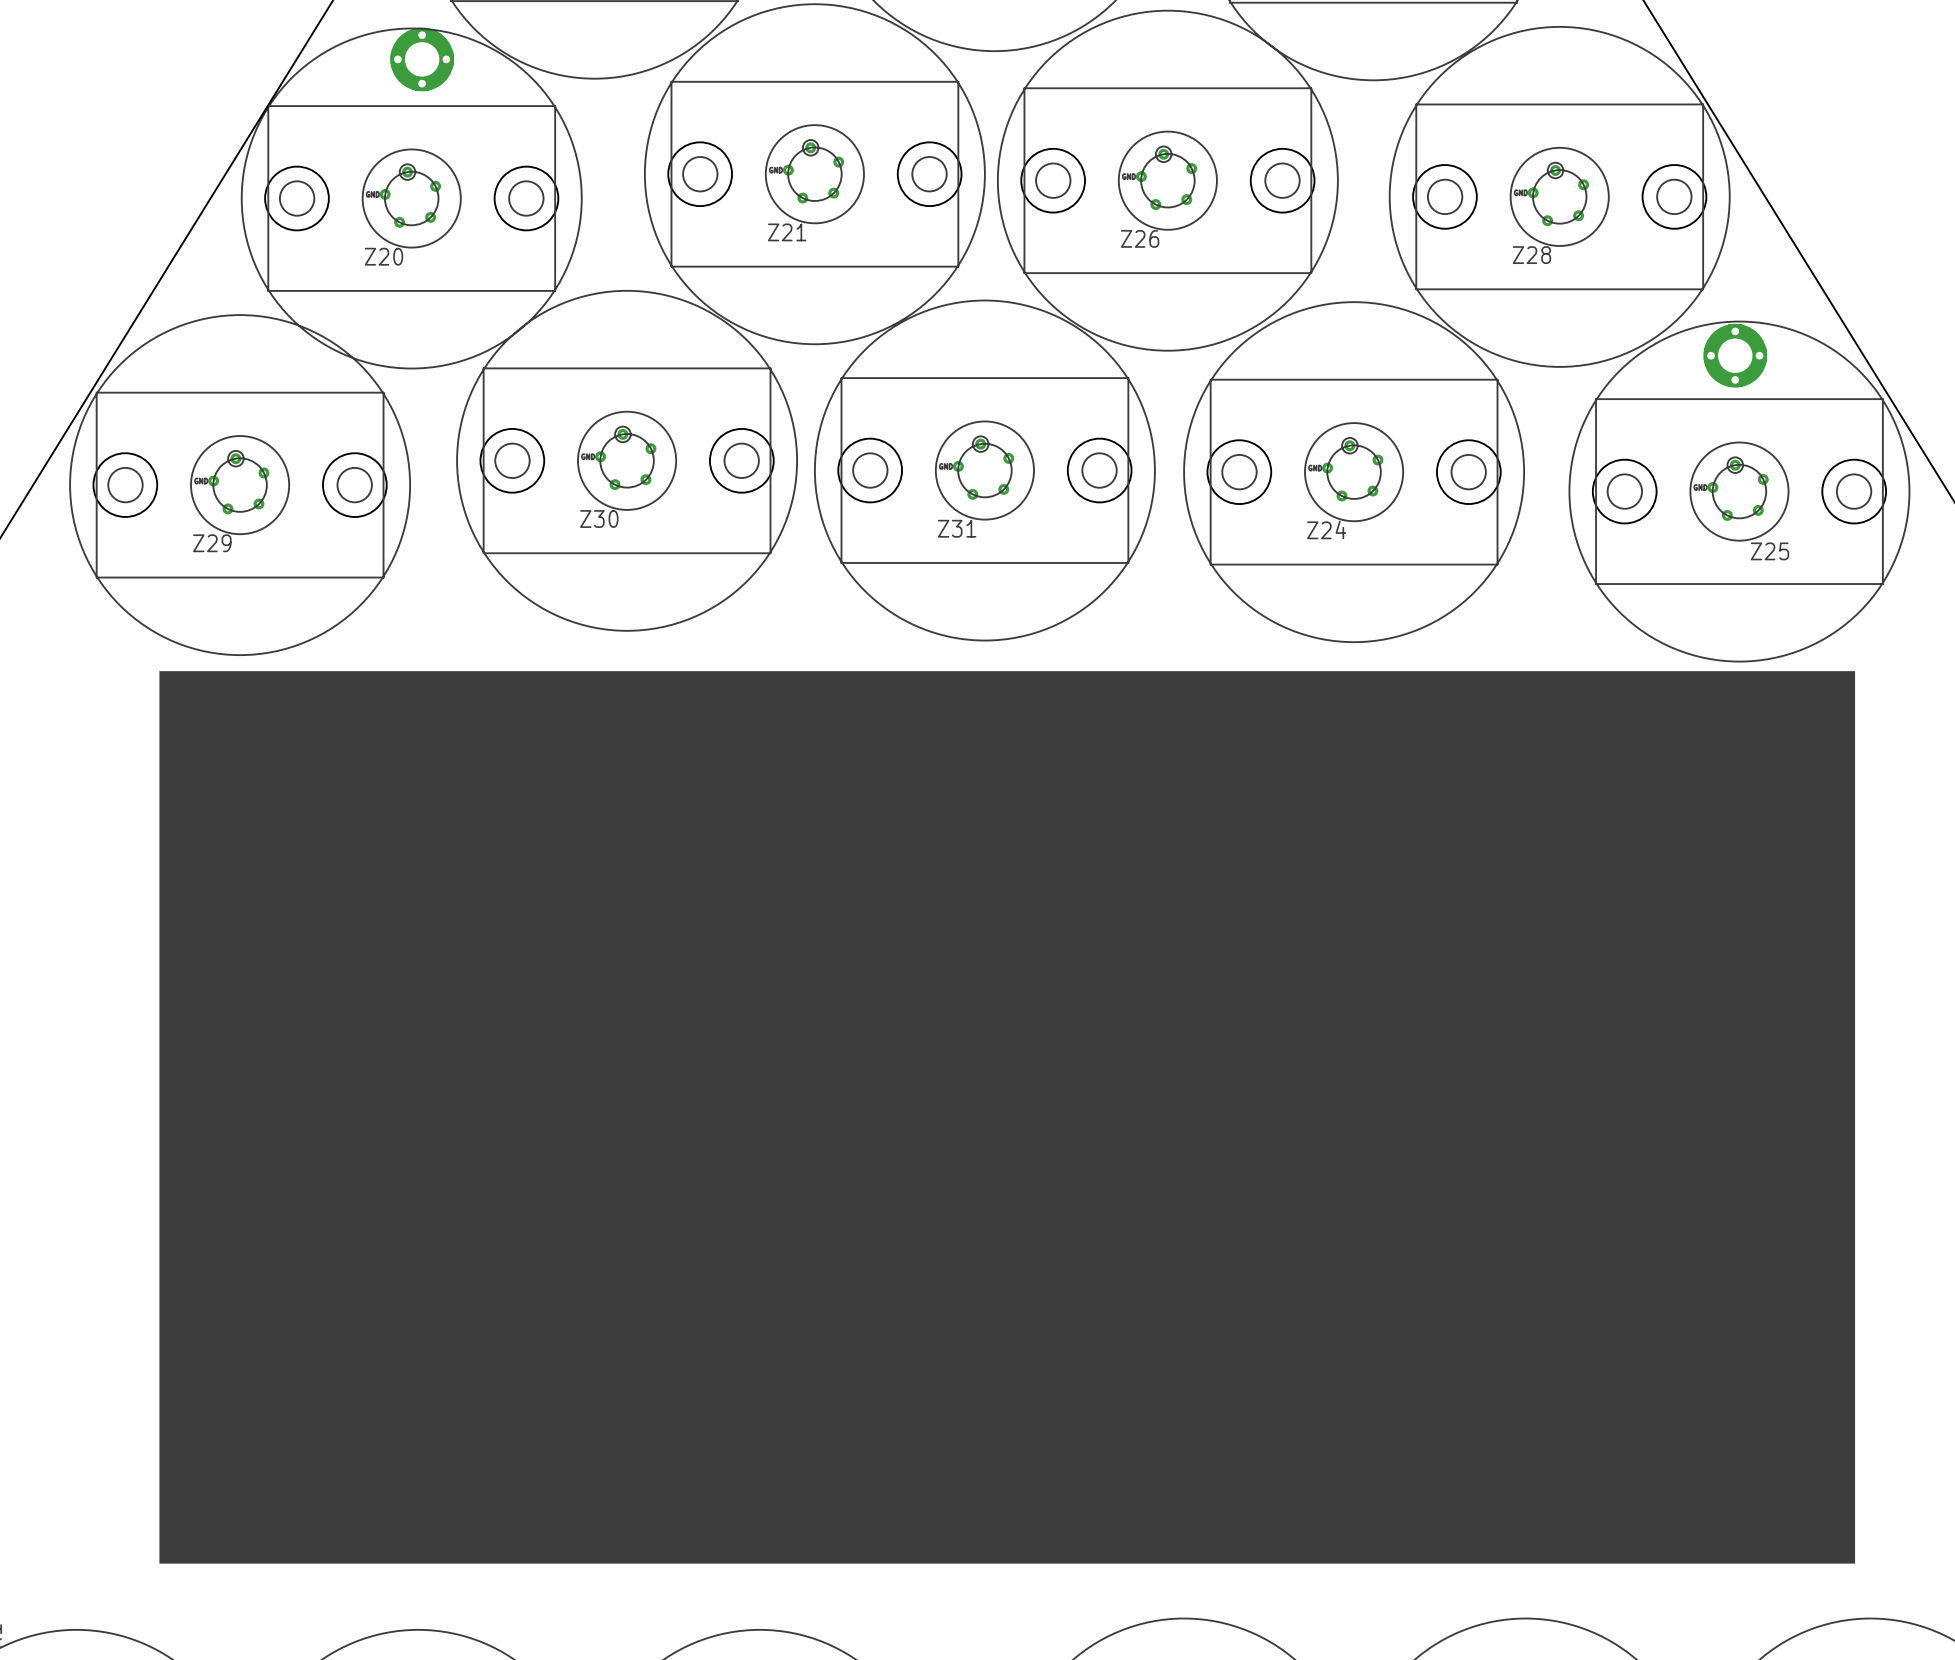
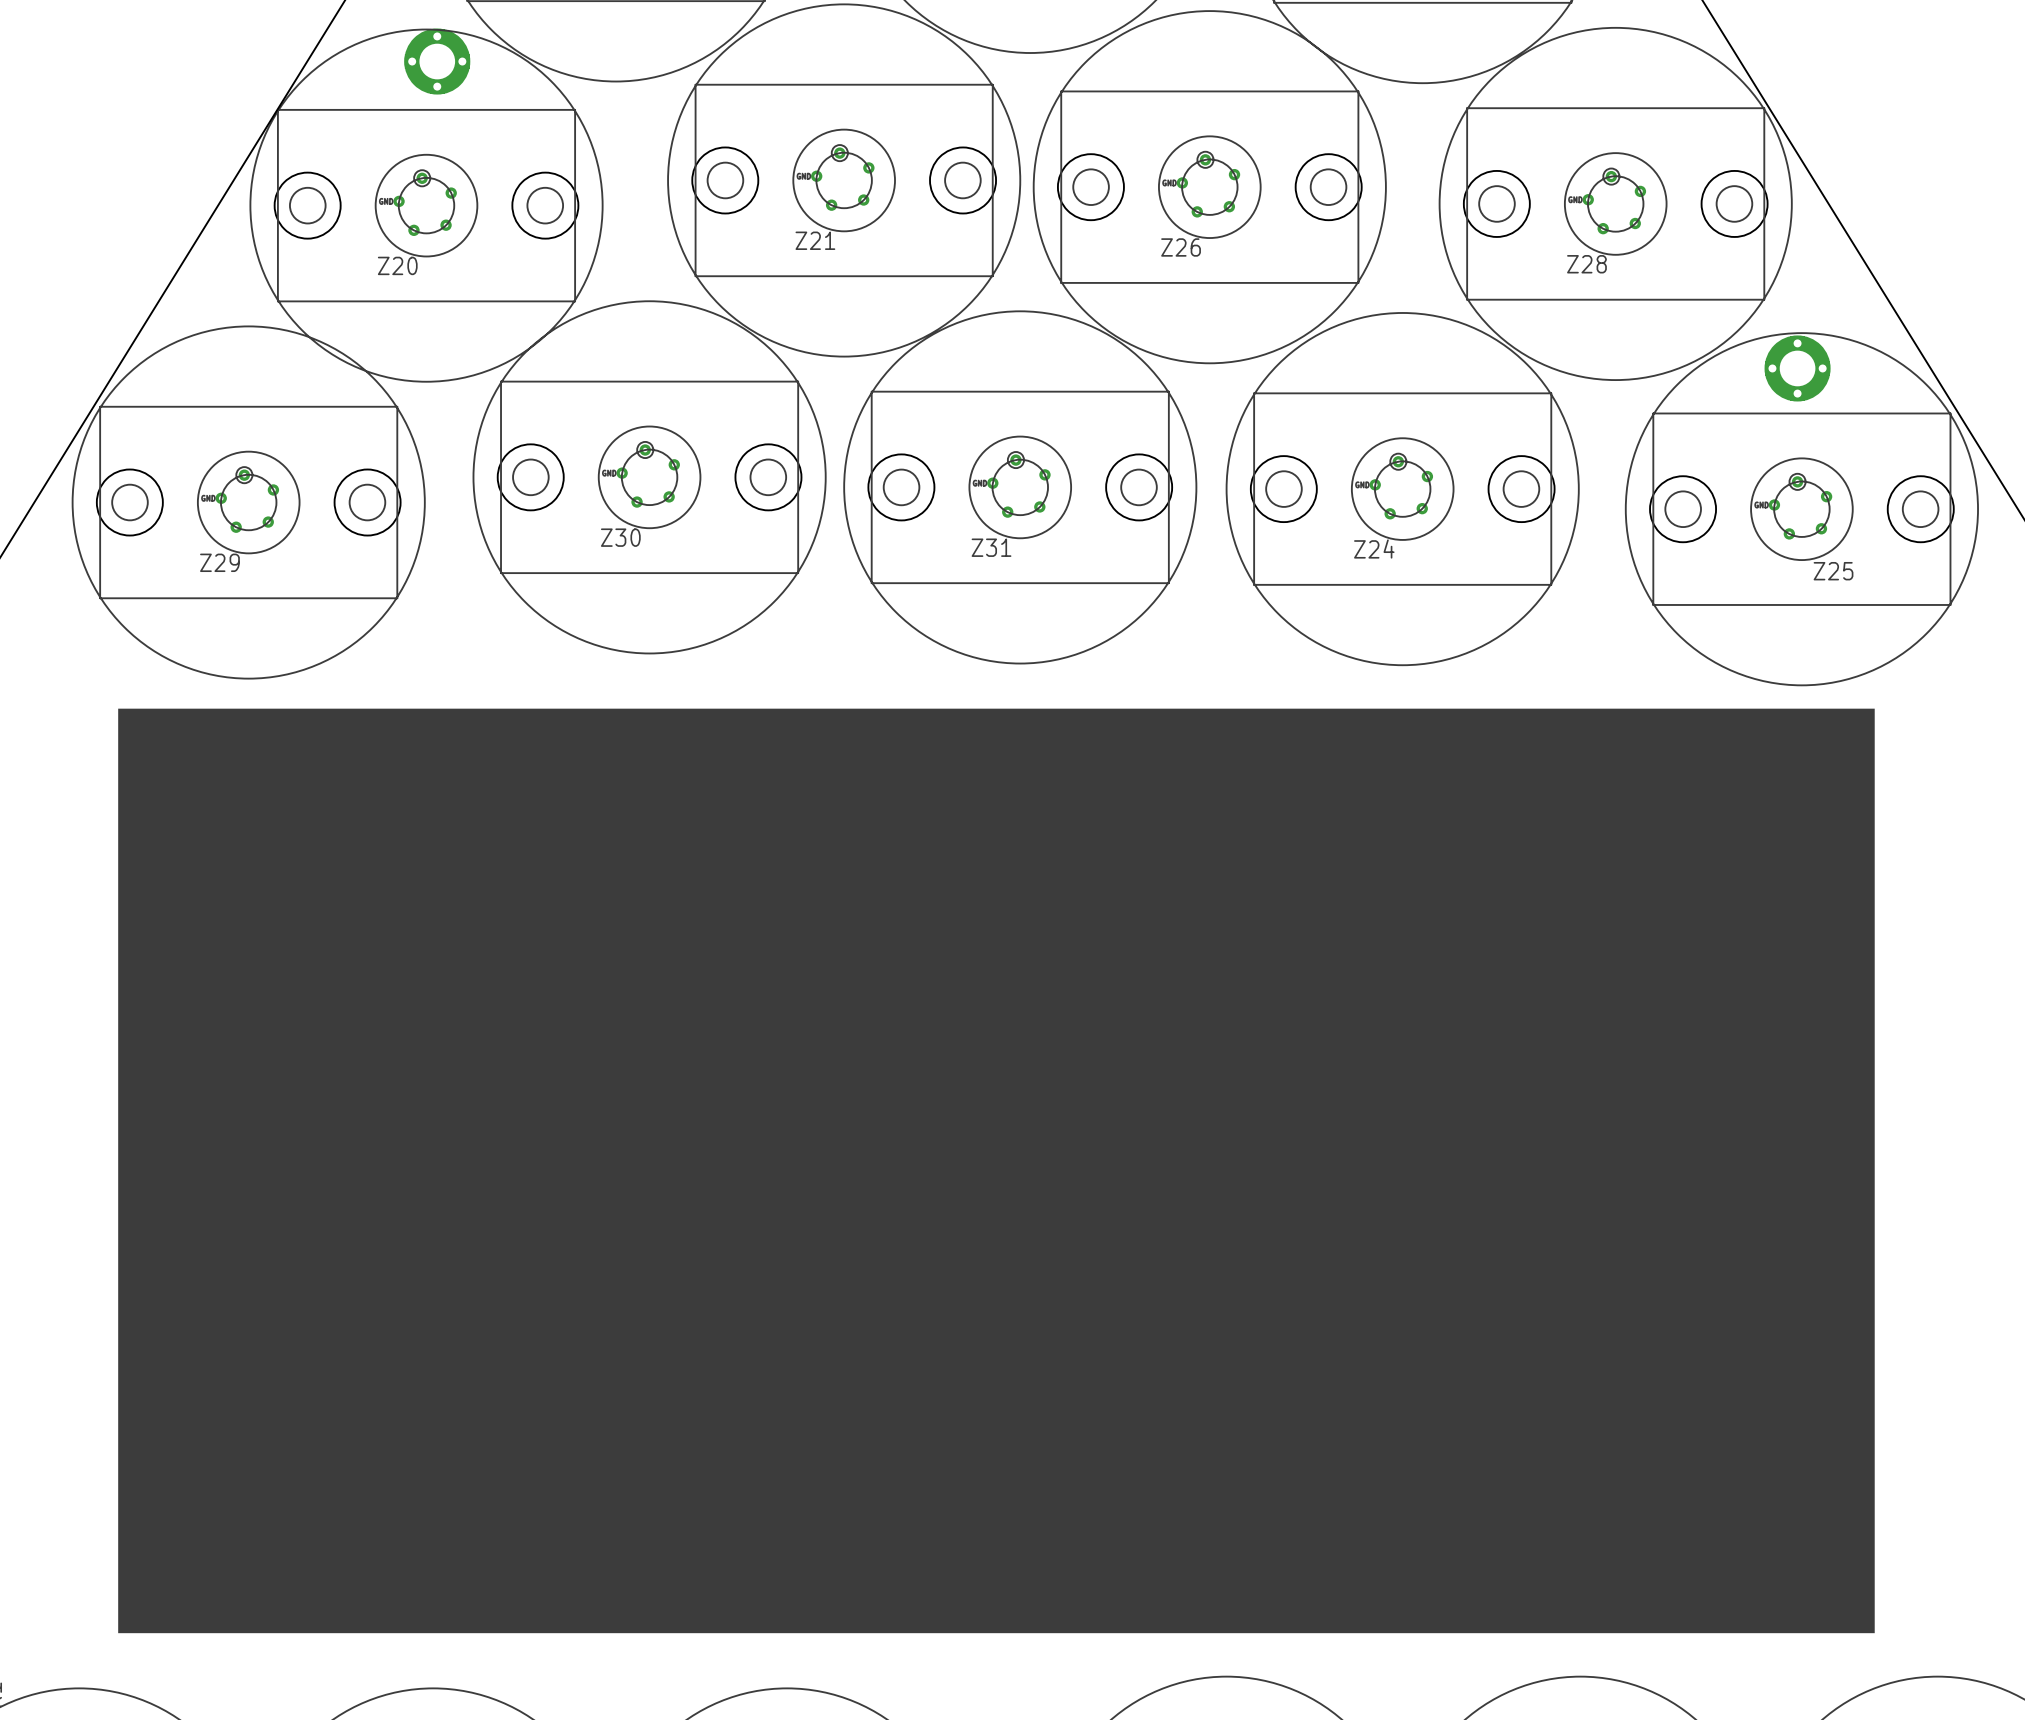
drawing position: (1007, 1117) -> (996, 1170)

